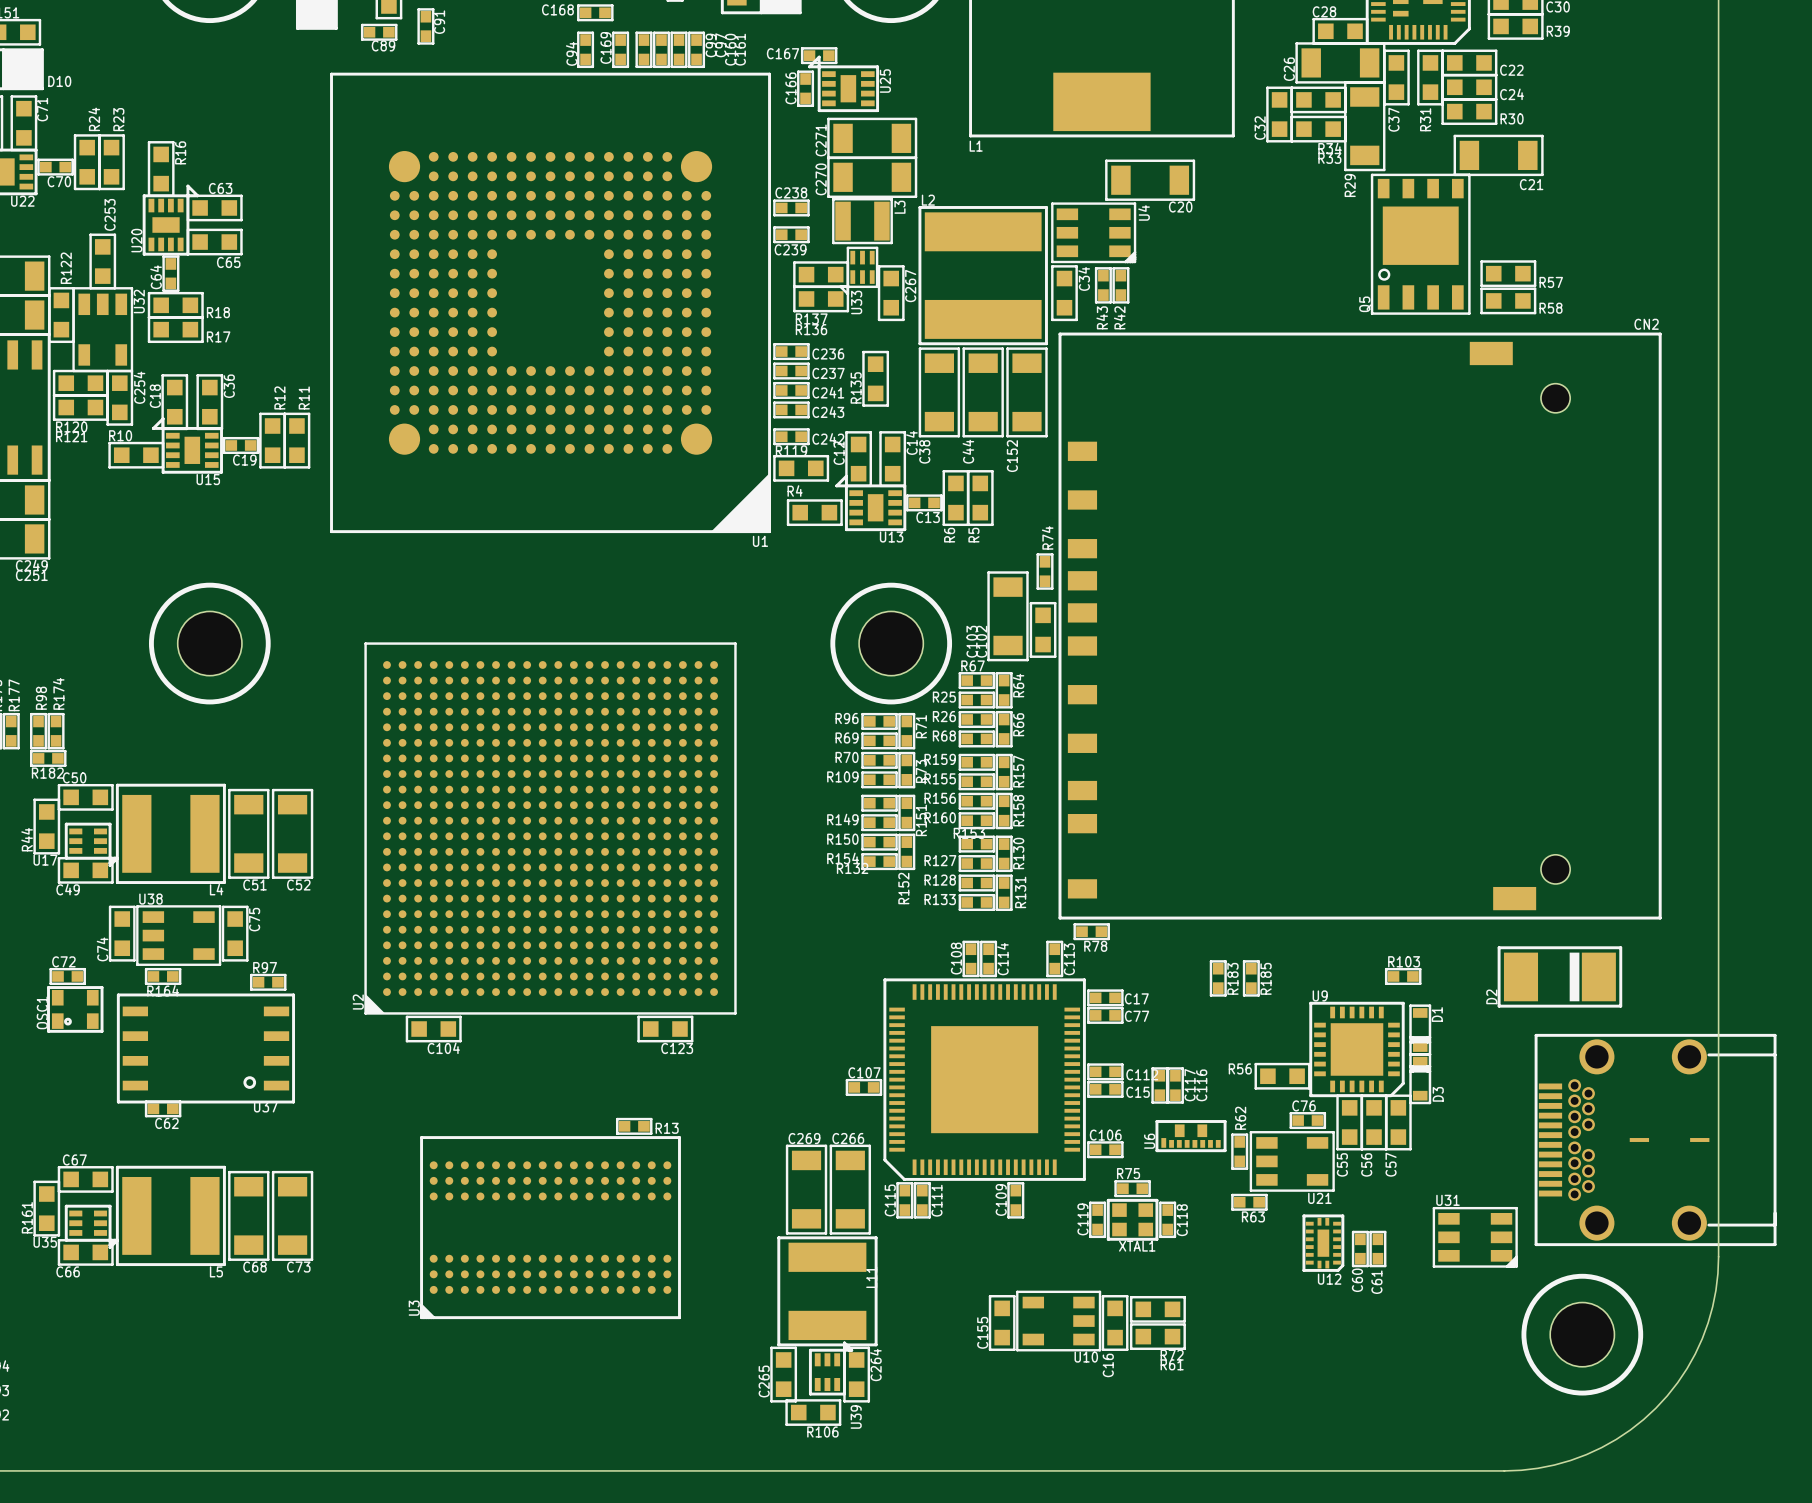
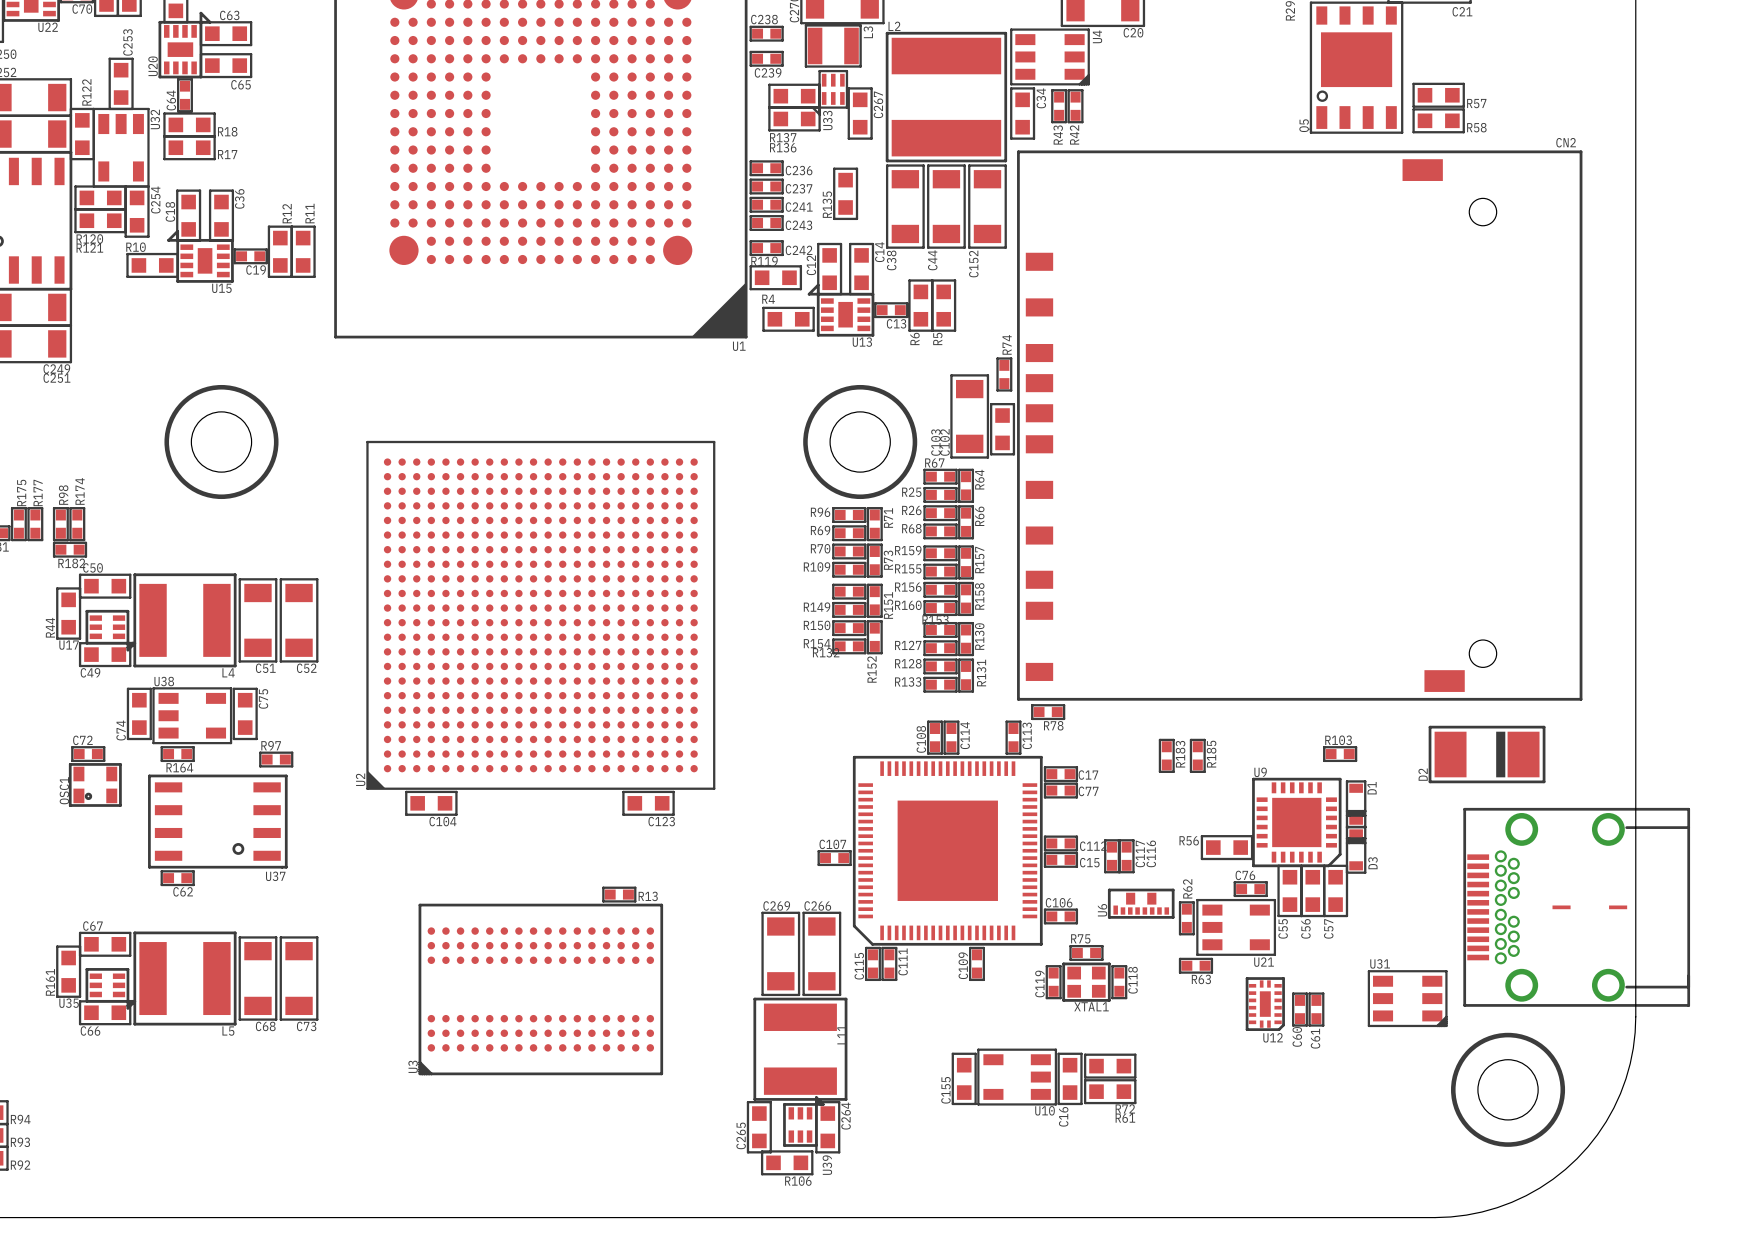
U37 footprint: [116, 993, 296, 1104] -> [148, 774, 288, 869]

